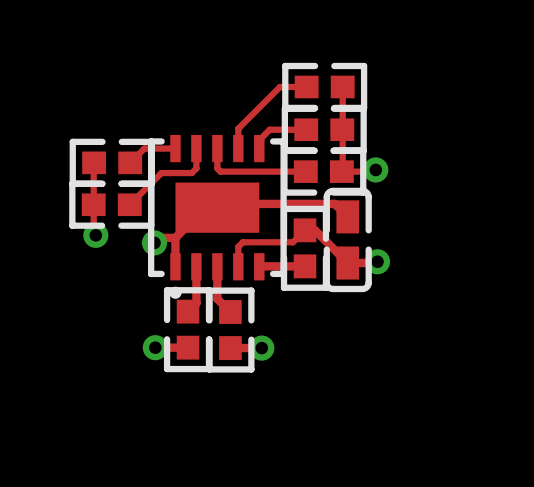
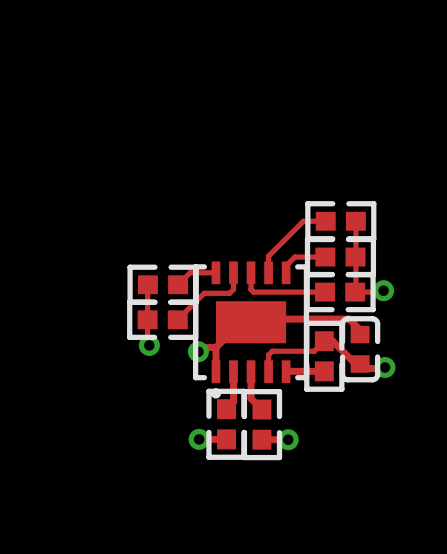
part footprint: [323, 187, 372, 293] -> [339, 316, 381, 383]

